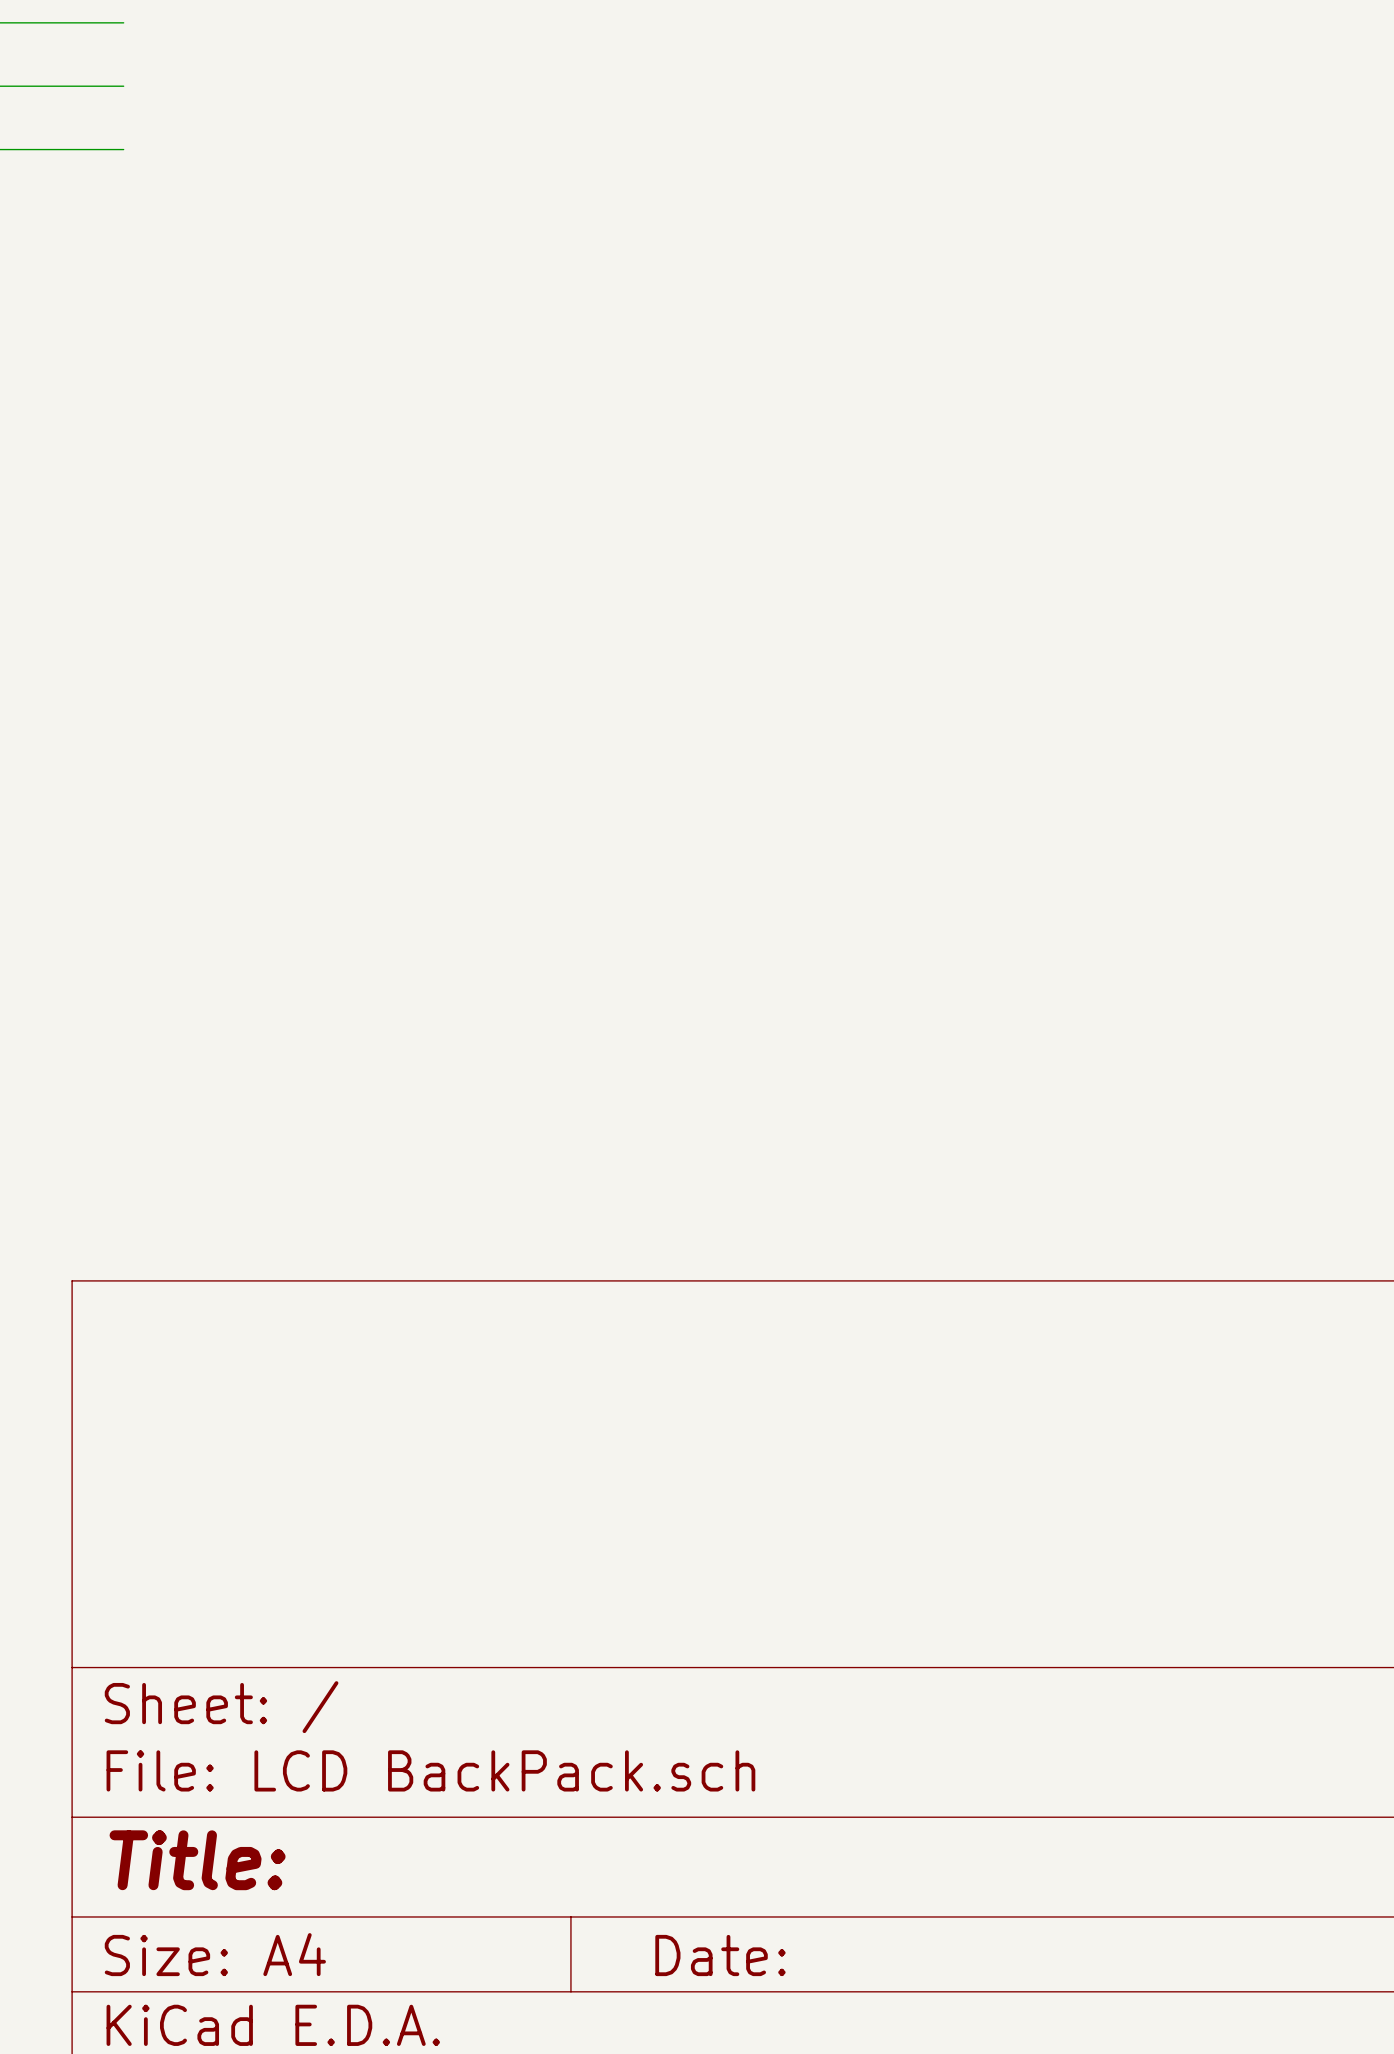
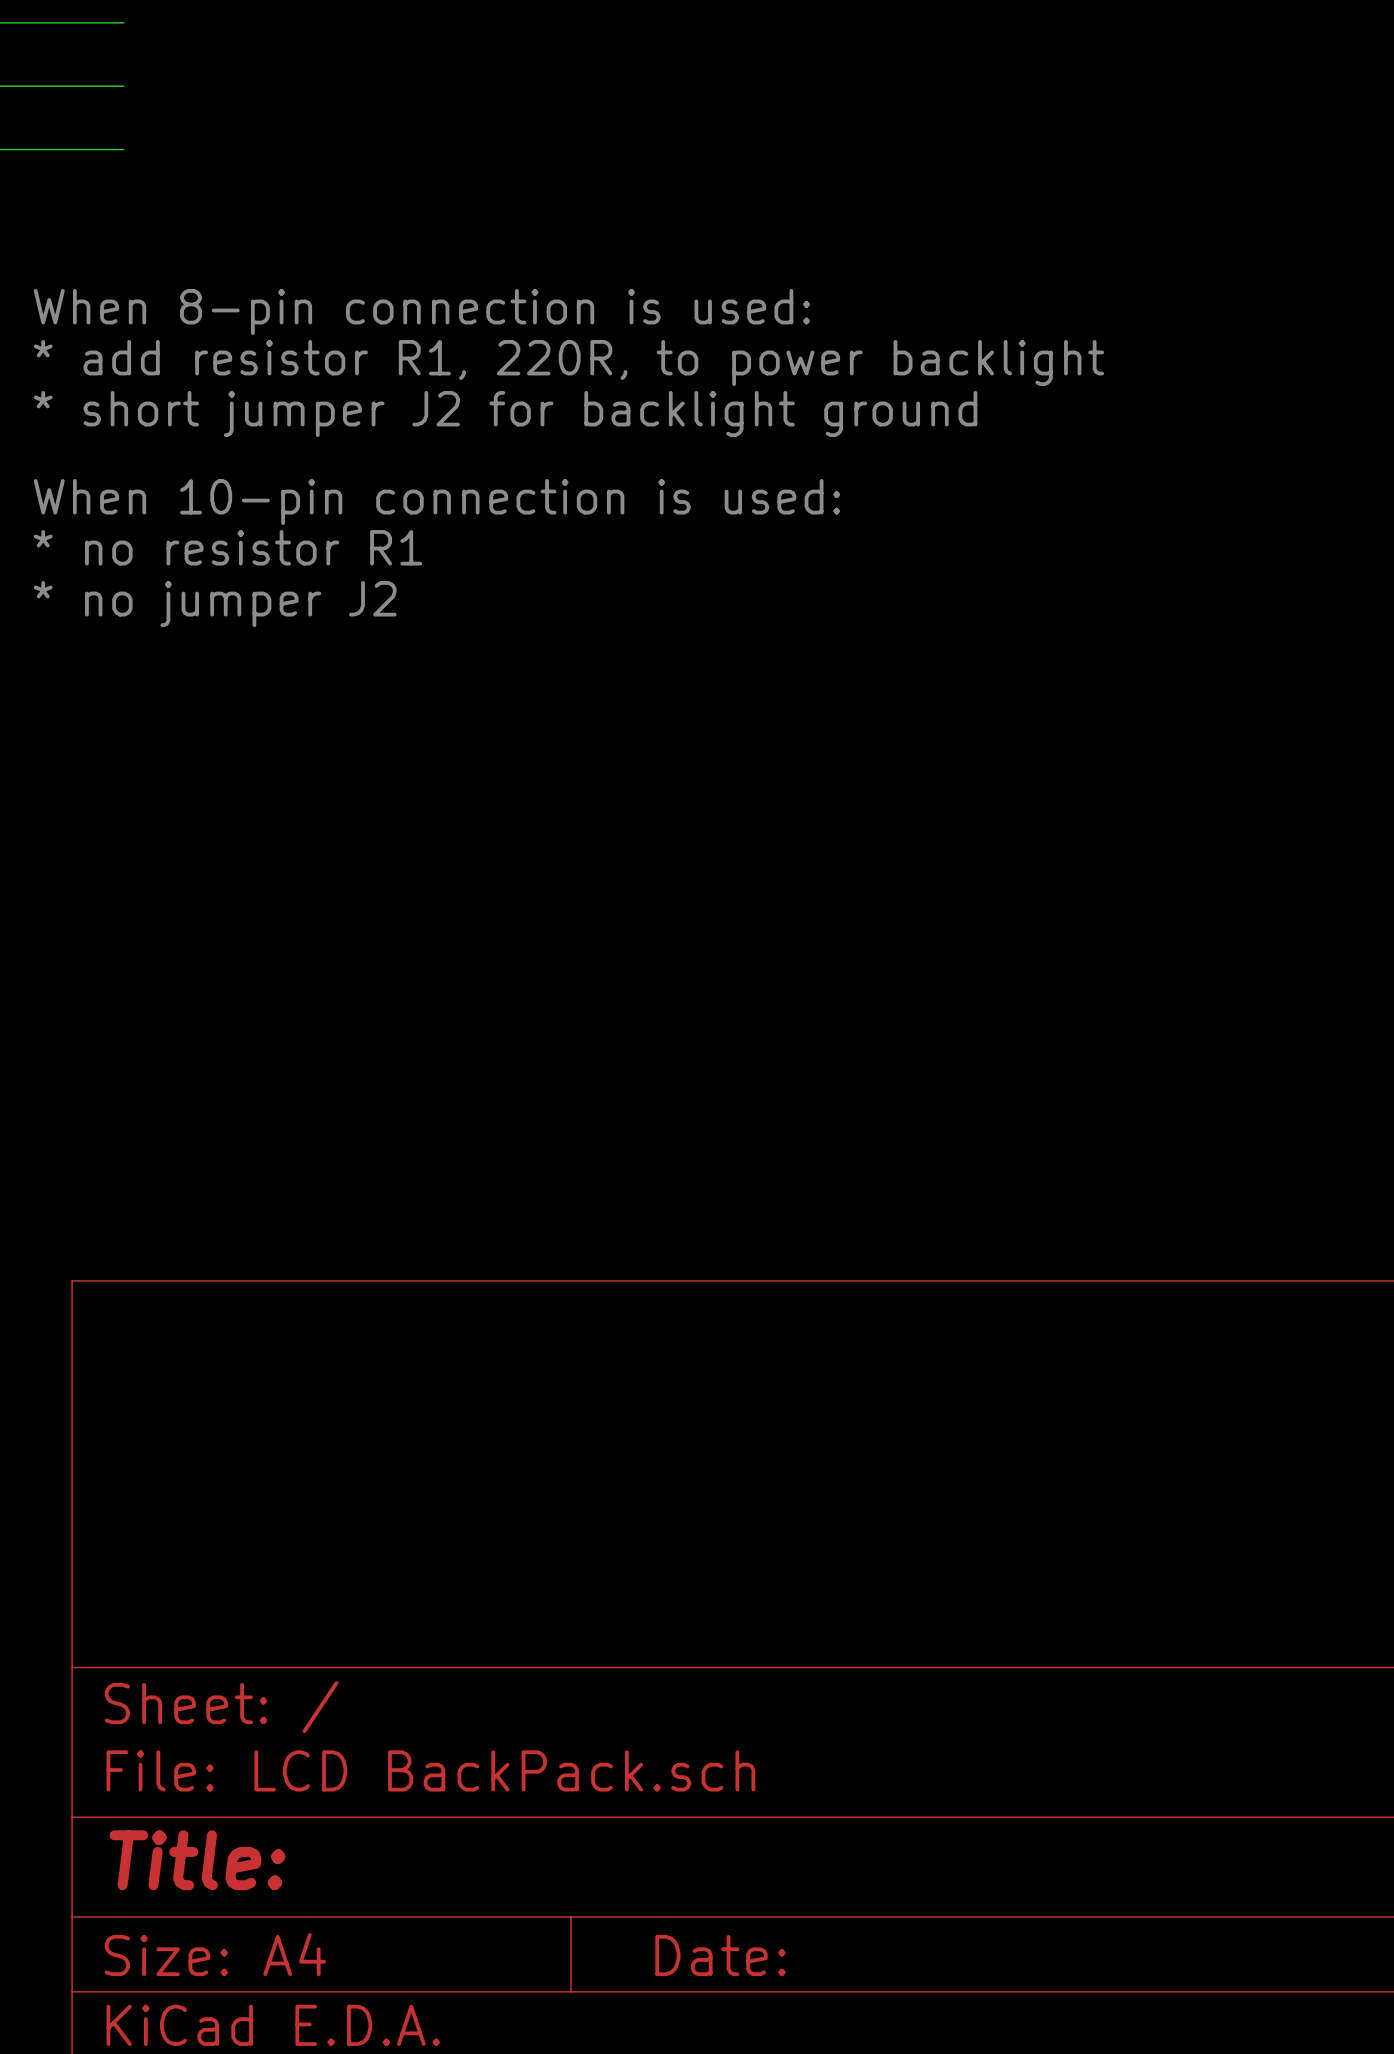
text: none -> When 8-pin connection is used: (421, 311)
text: none -> * add resistor R1, 220R, to power backlight (568, 362)
text: none -> * short jumper J2 for backlight ground (505, 413)
text: none -> When 10-pin connection is used: (436, 502)
text: none -> * no resistor R1 (227, 547)
text: none -> * no jumper J2 (215, 604)

